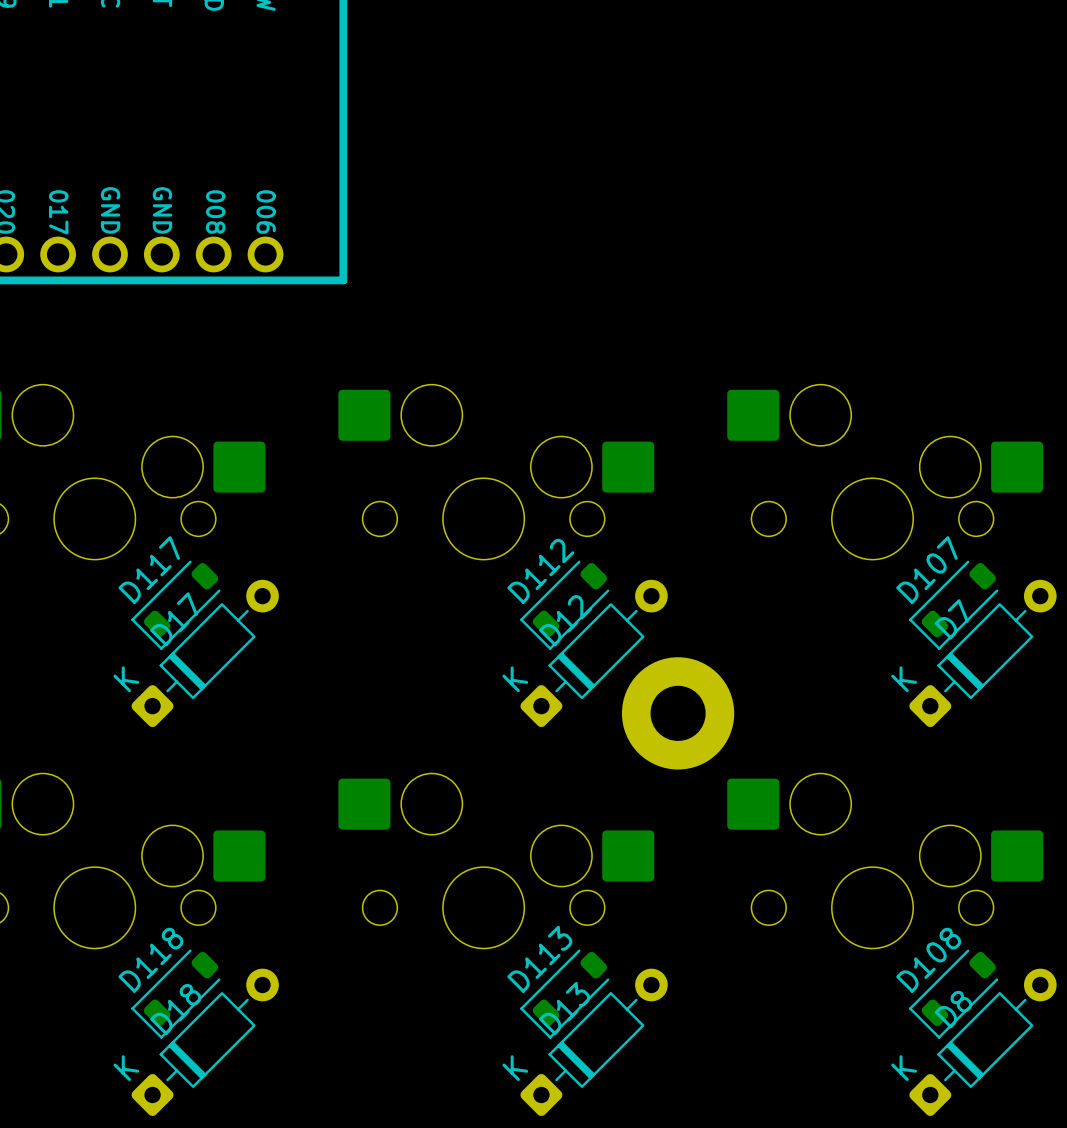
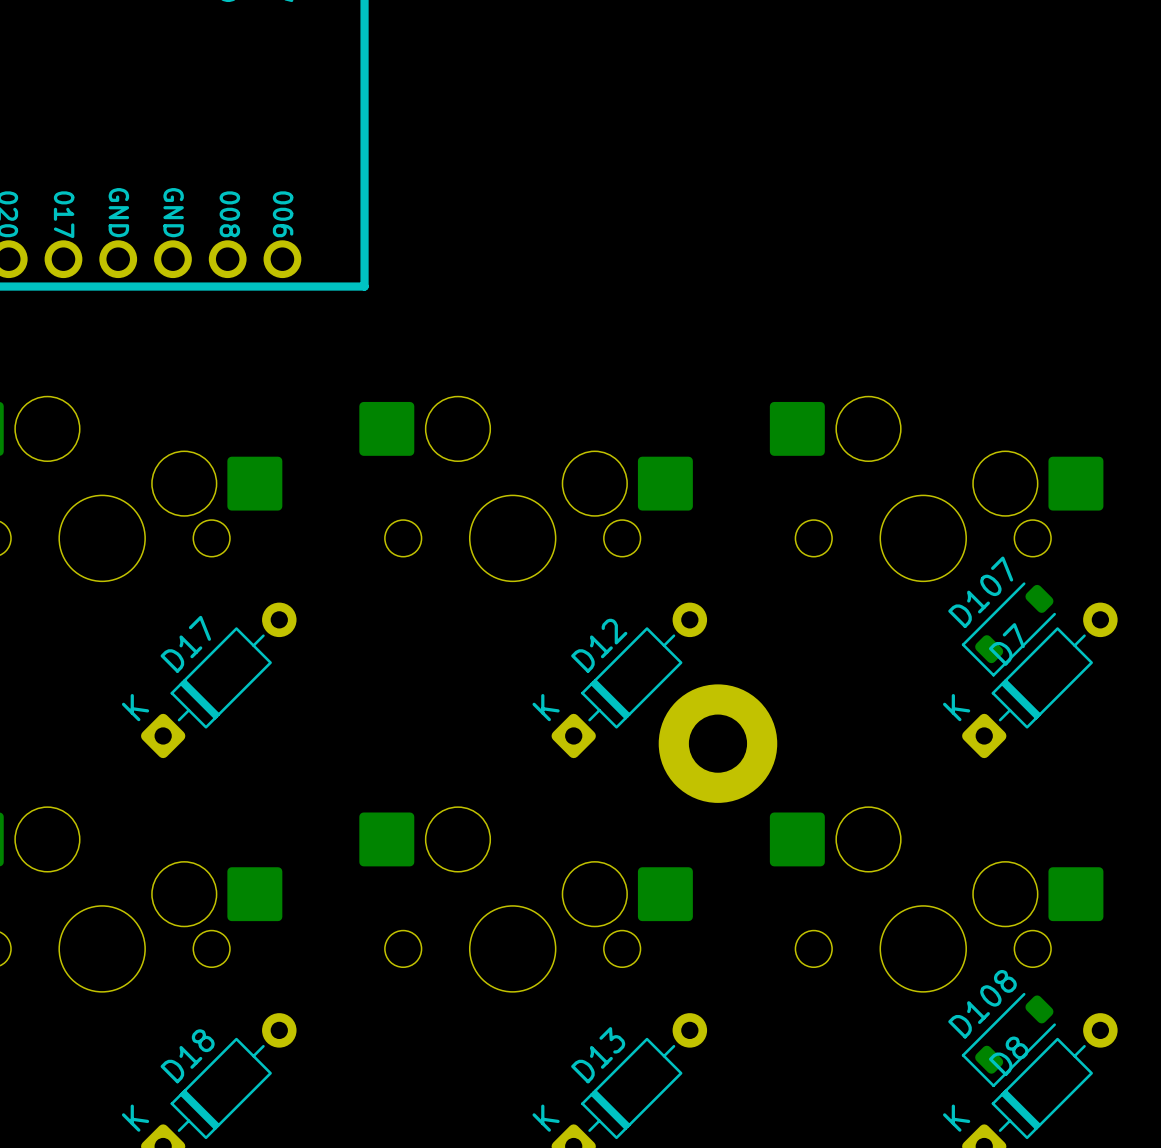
D117: (175, 605) -> none
D112: (564, 605) -> none
D118: (175, 994) -> none
D113: (564, 994) -> none

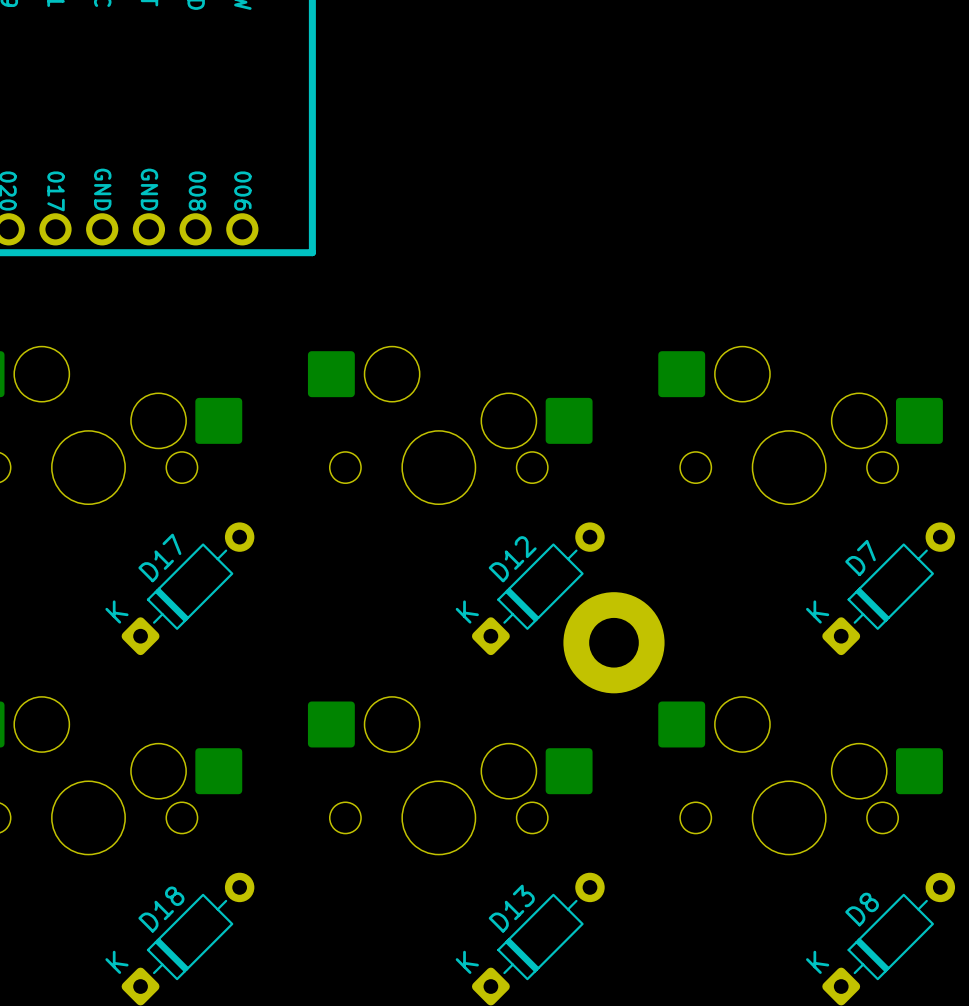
D107: (1008, 629) -> none
D108: (1008, 1039) -> none

